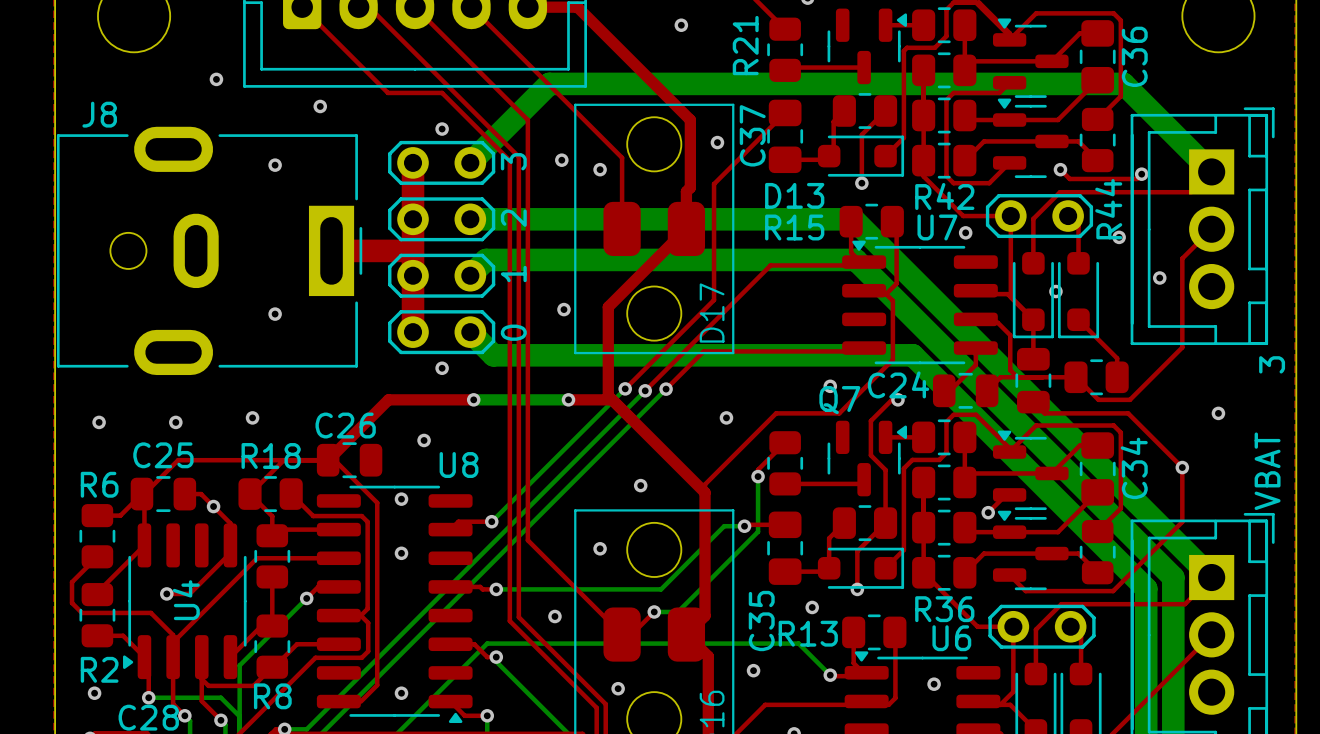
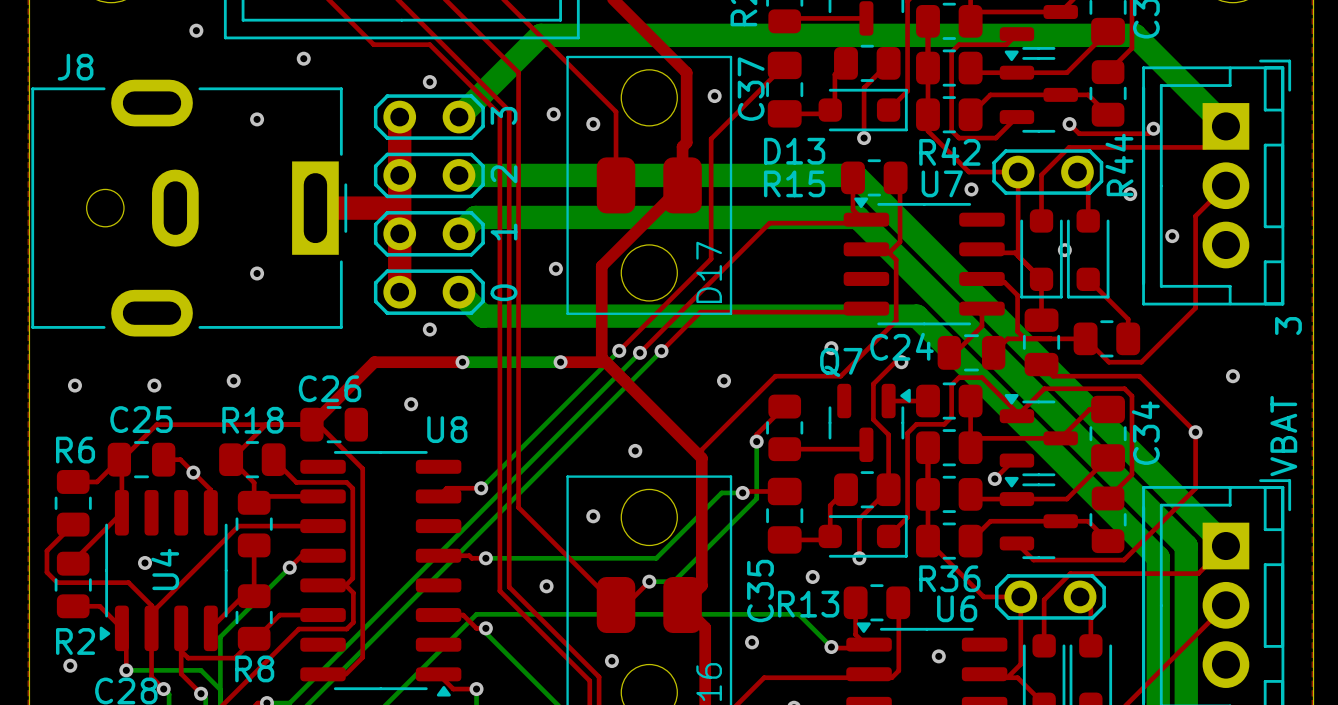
via: (401, 499) -> none
top track: (230, 545) (230, 553) (189, 593) (166, 593) -> none
via: (401, 553) -> none
via: (401, 693) -> none

